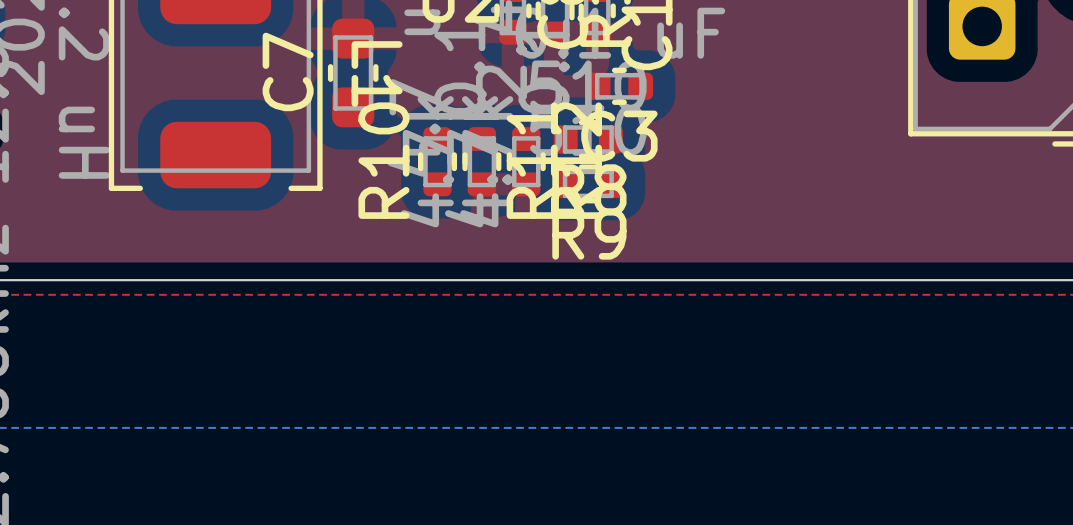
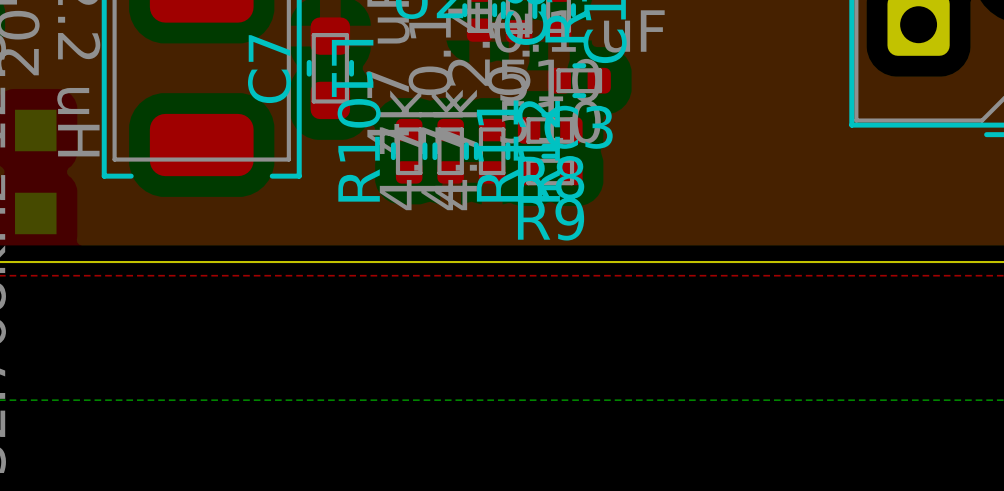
part: none -> (35, 130)
part: none -> (35, 213)

